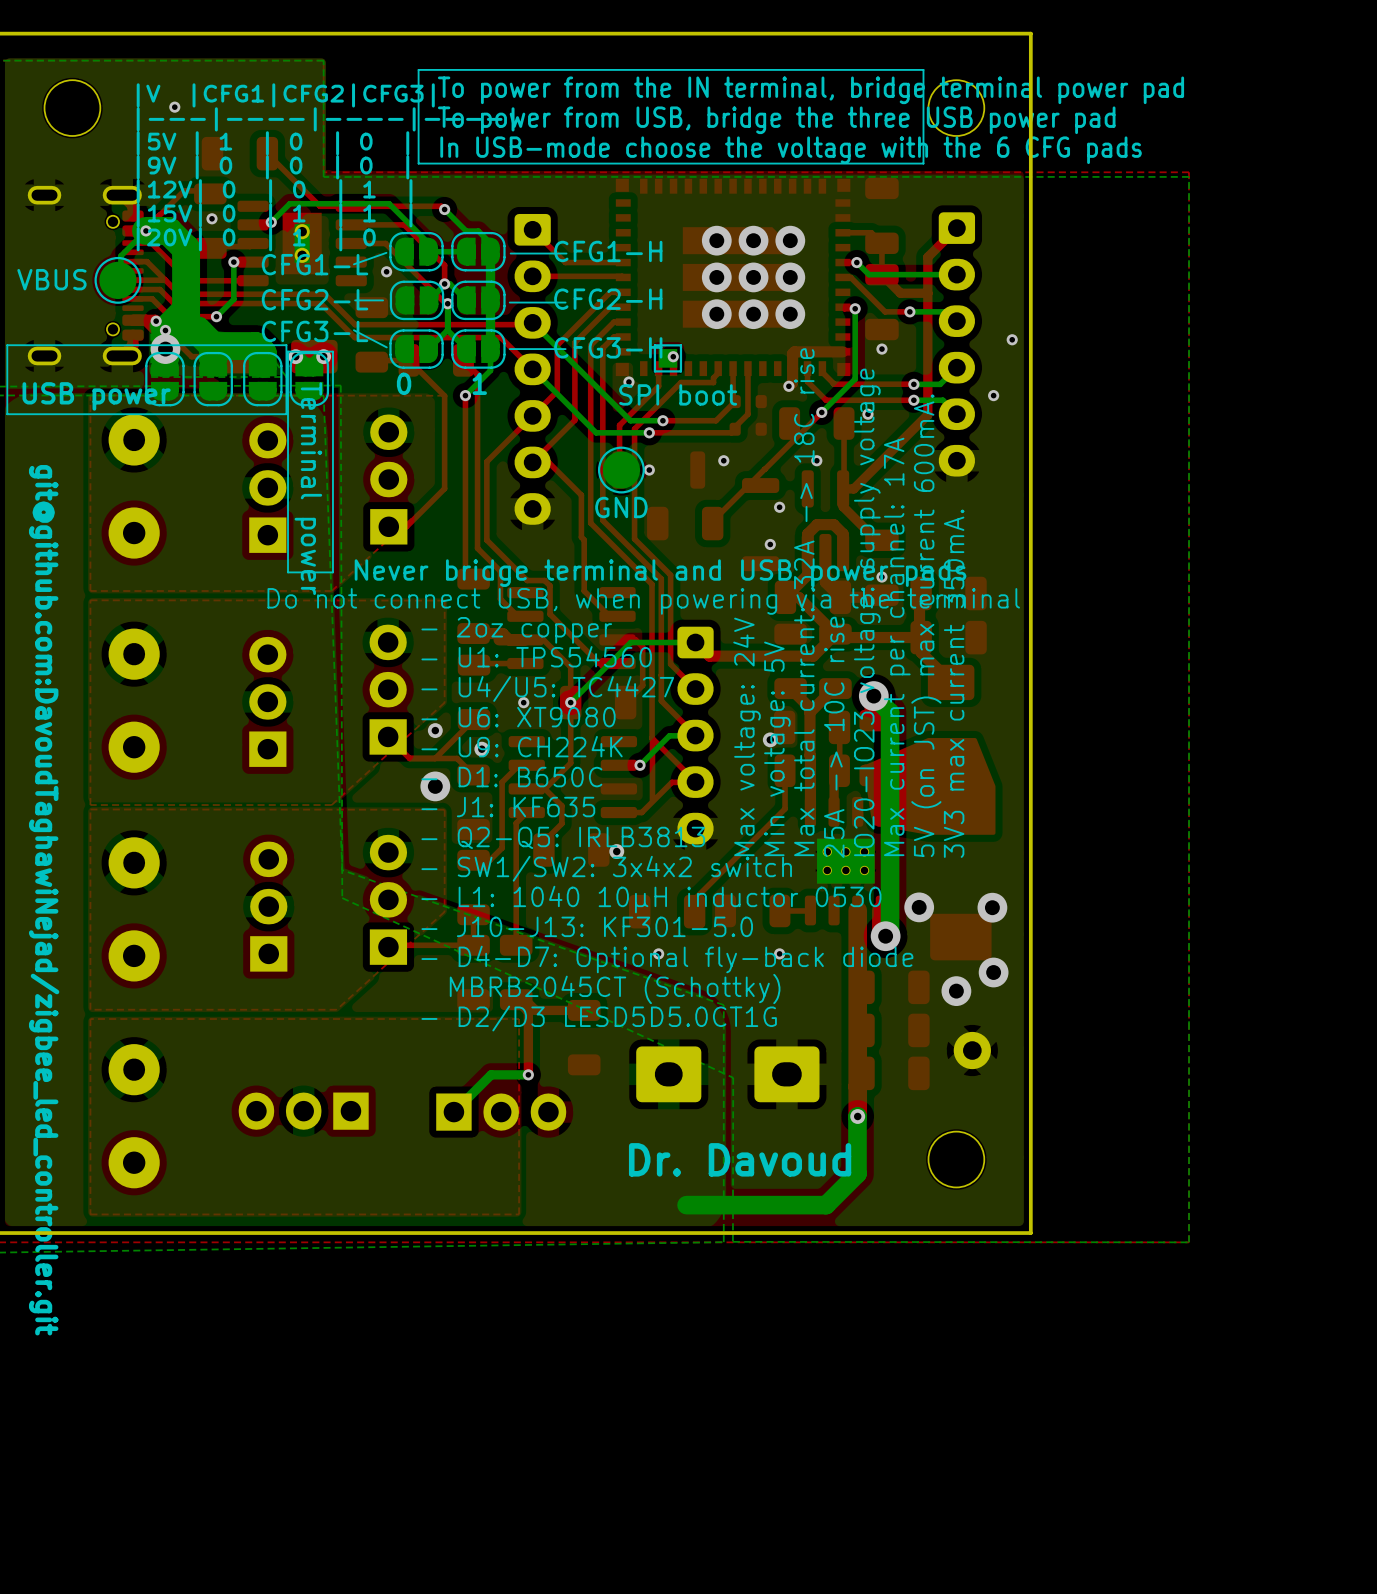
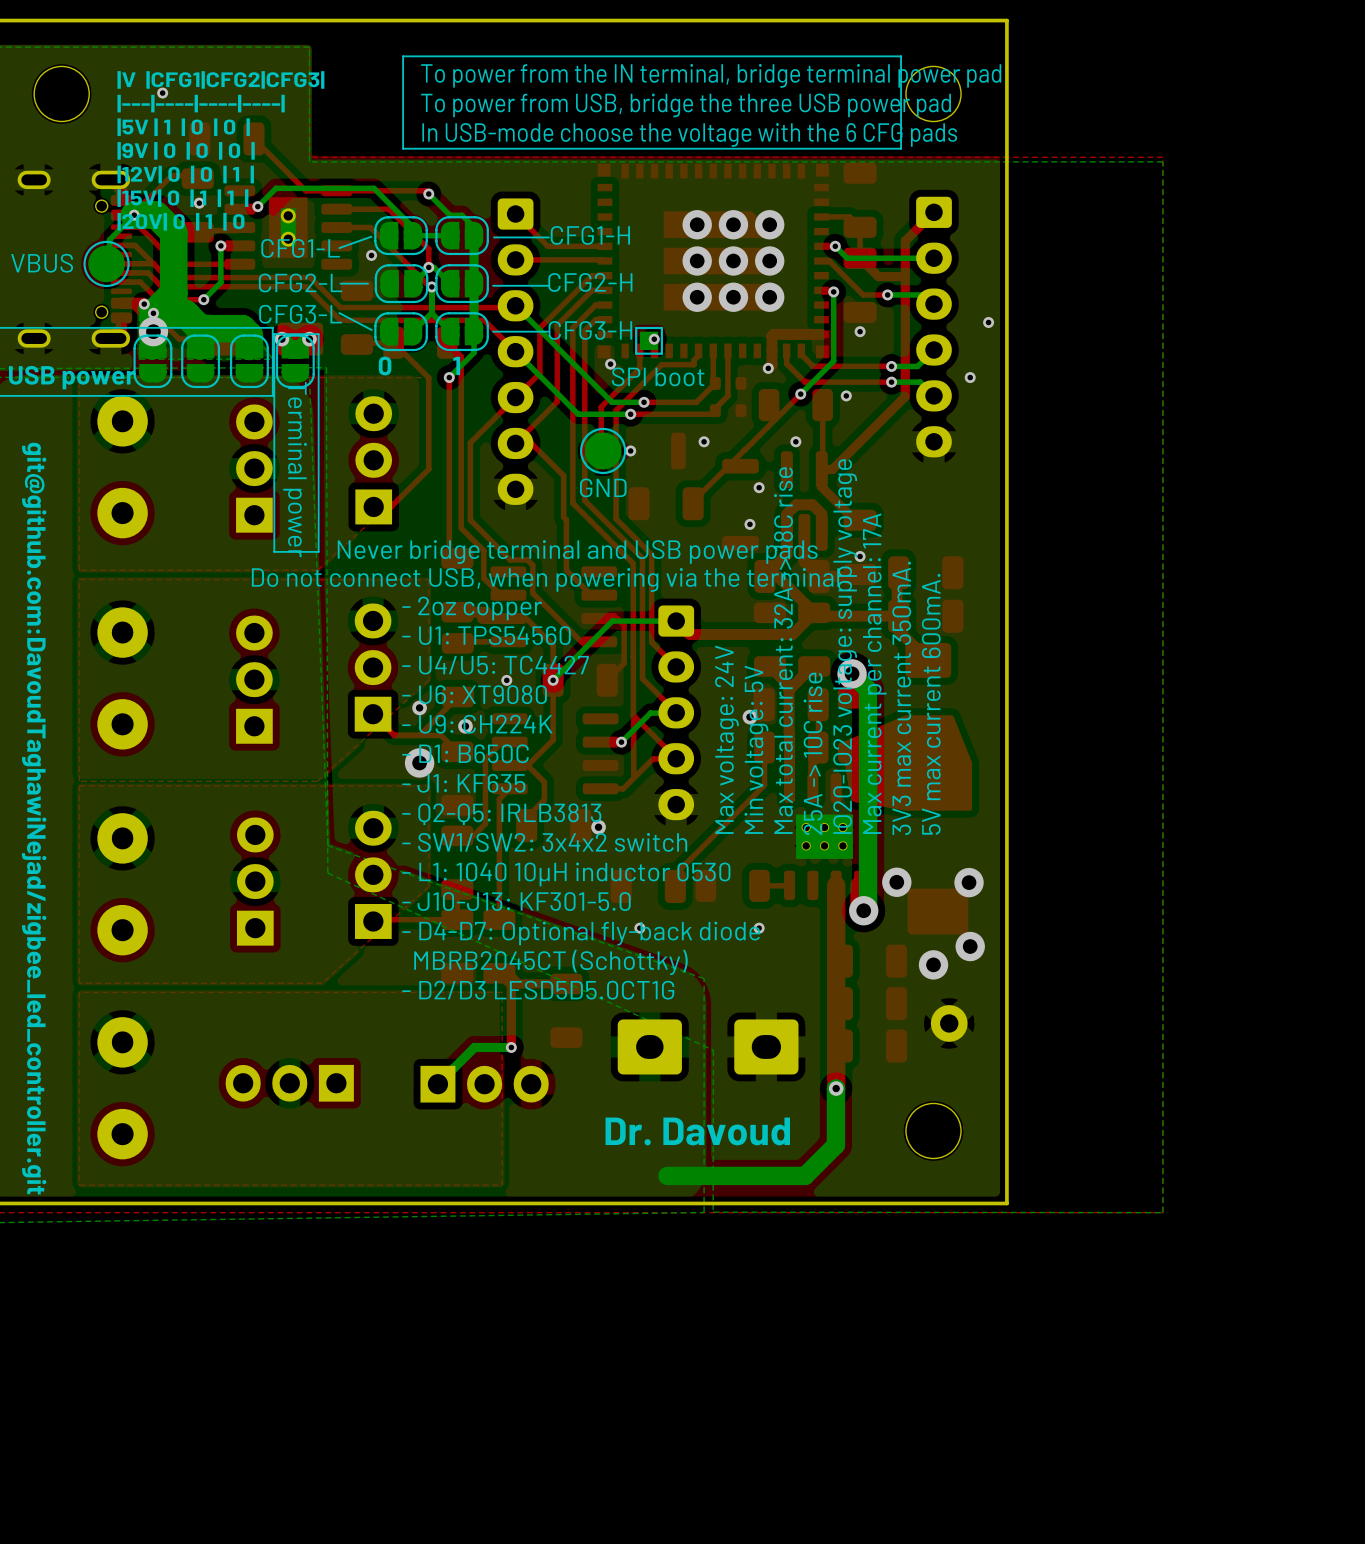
text: 5V (on JST) max current 600mA. (926, 625) -> 3V3 max current 350mA. (901, 698)
text: 3V3 max current 350mA. (954, 683) -> 5V max current 600mA. (931, 704)

